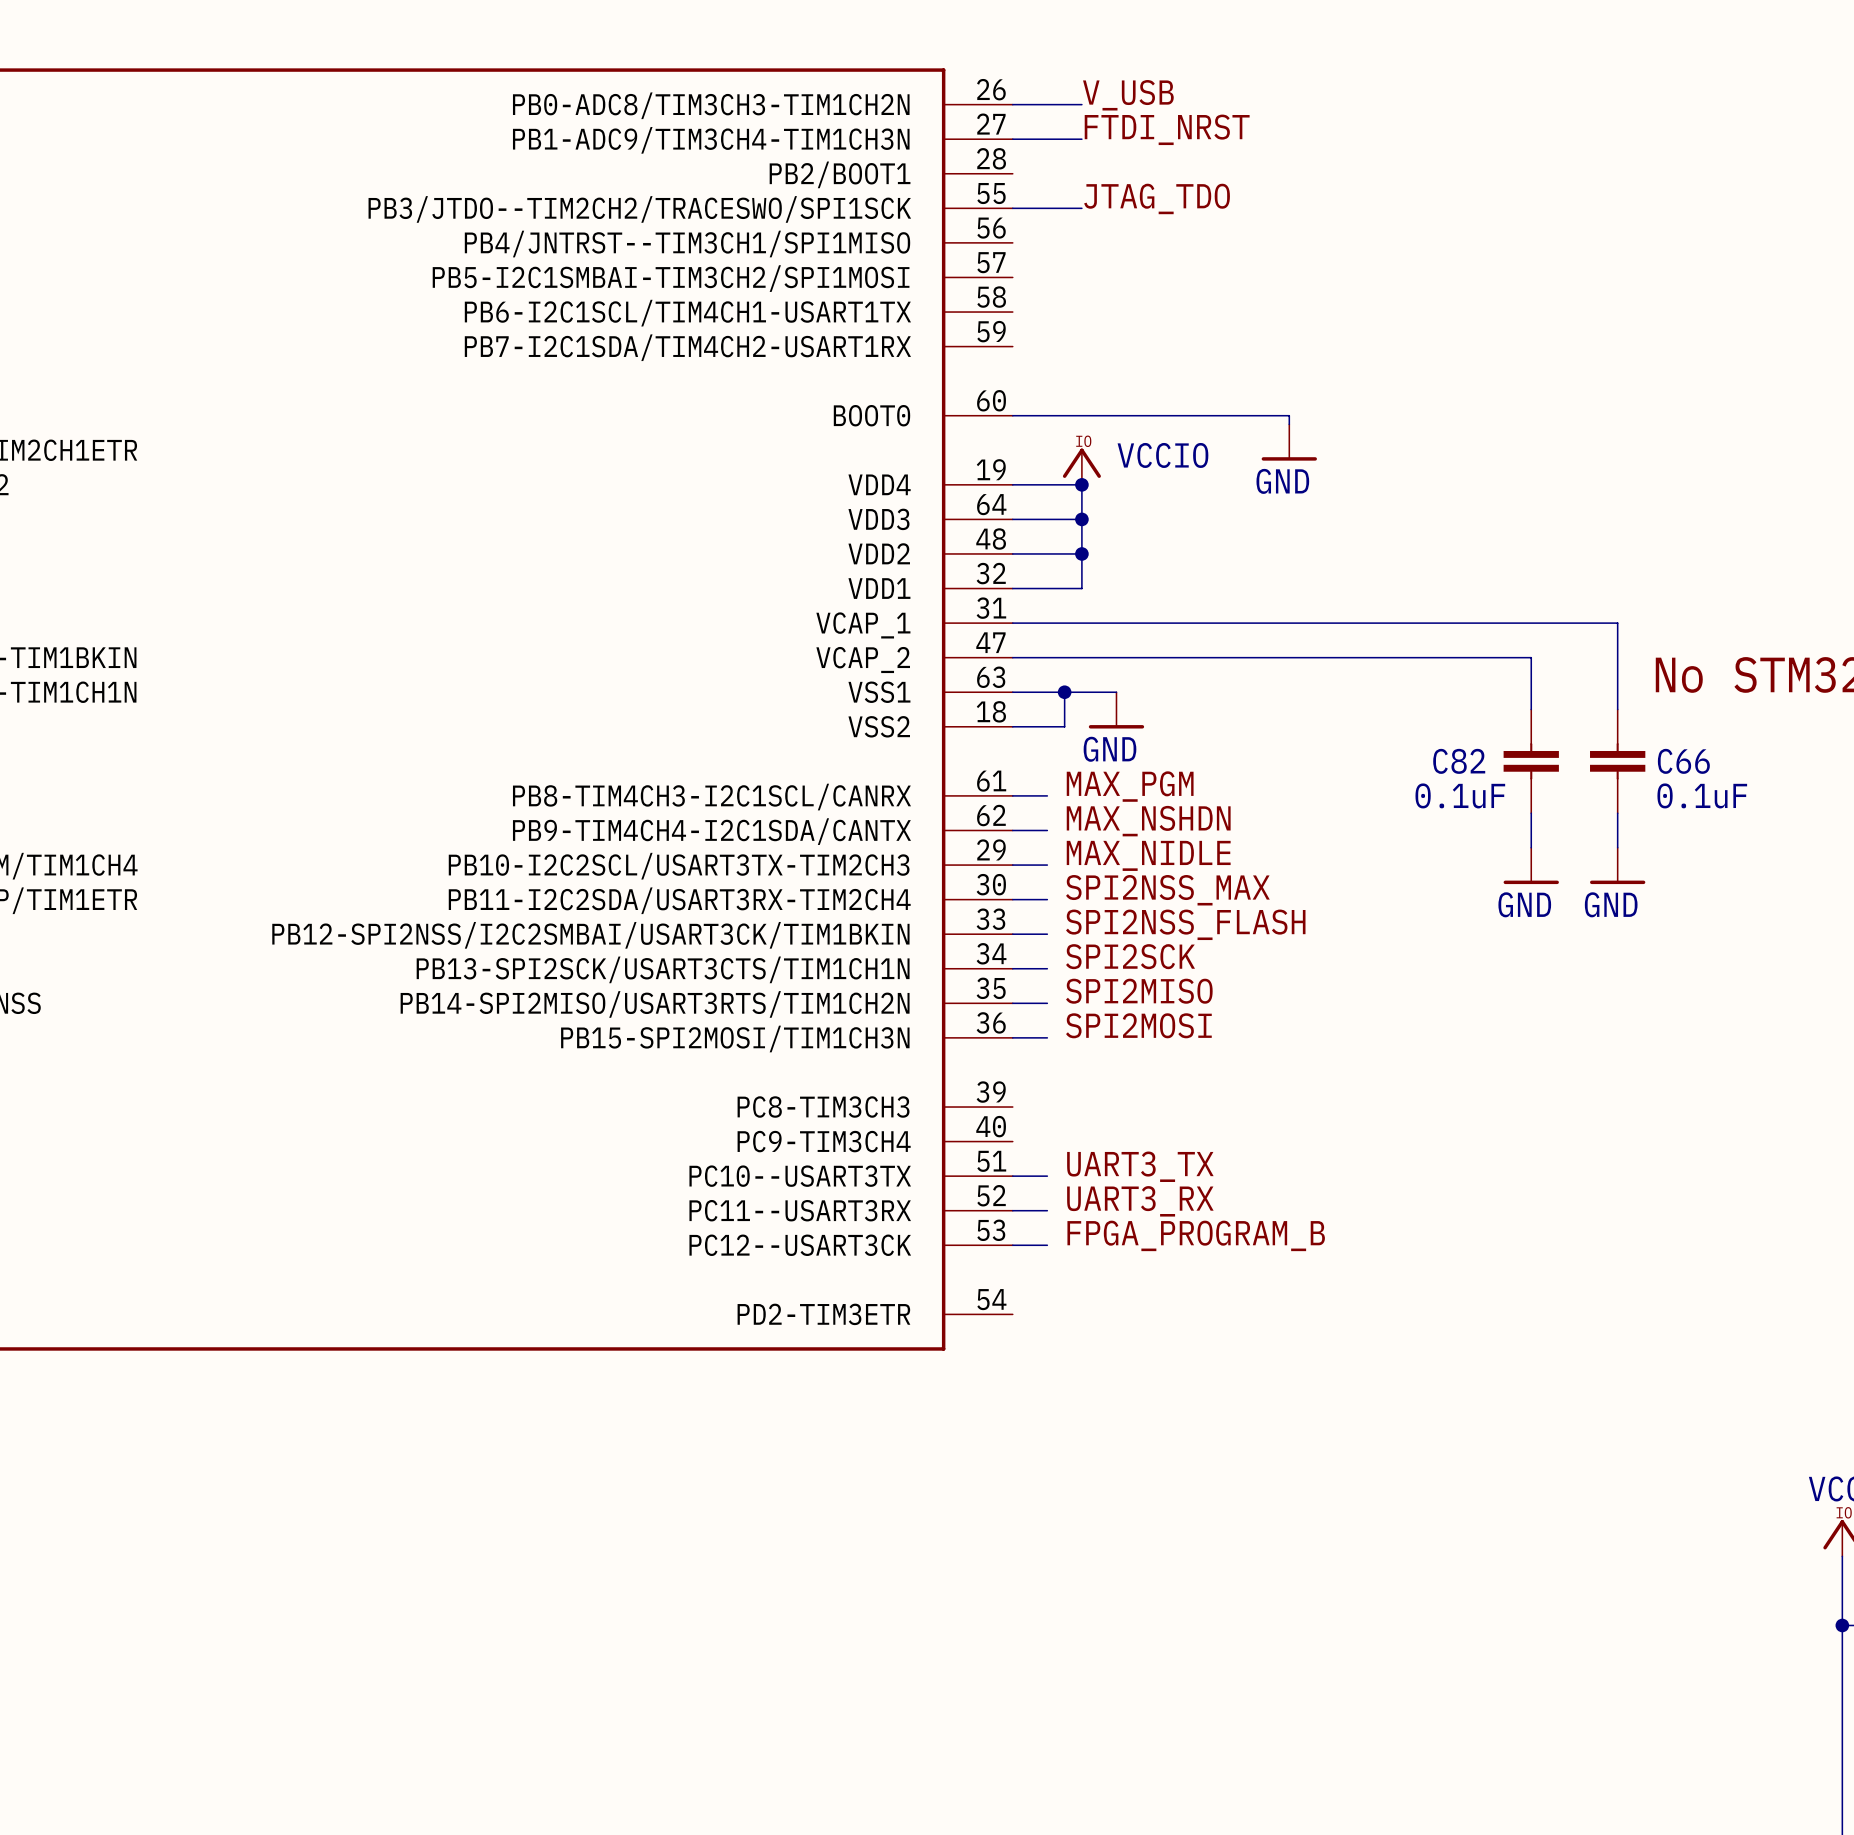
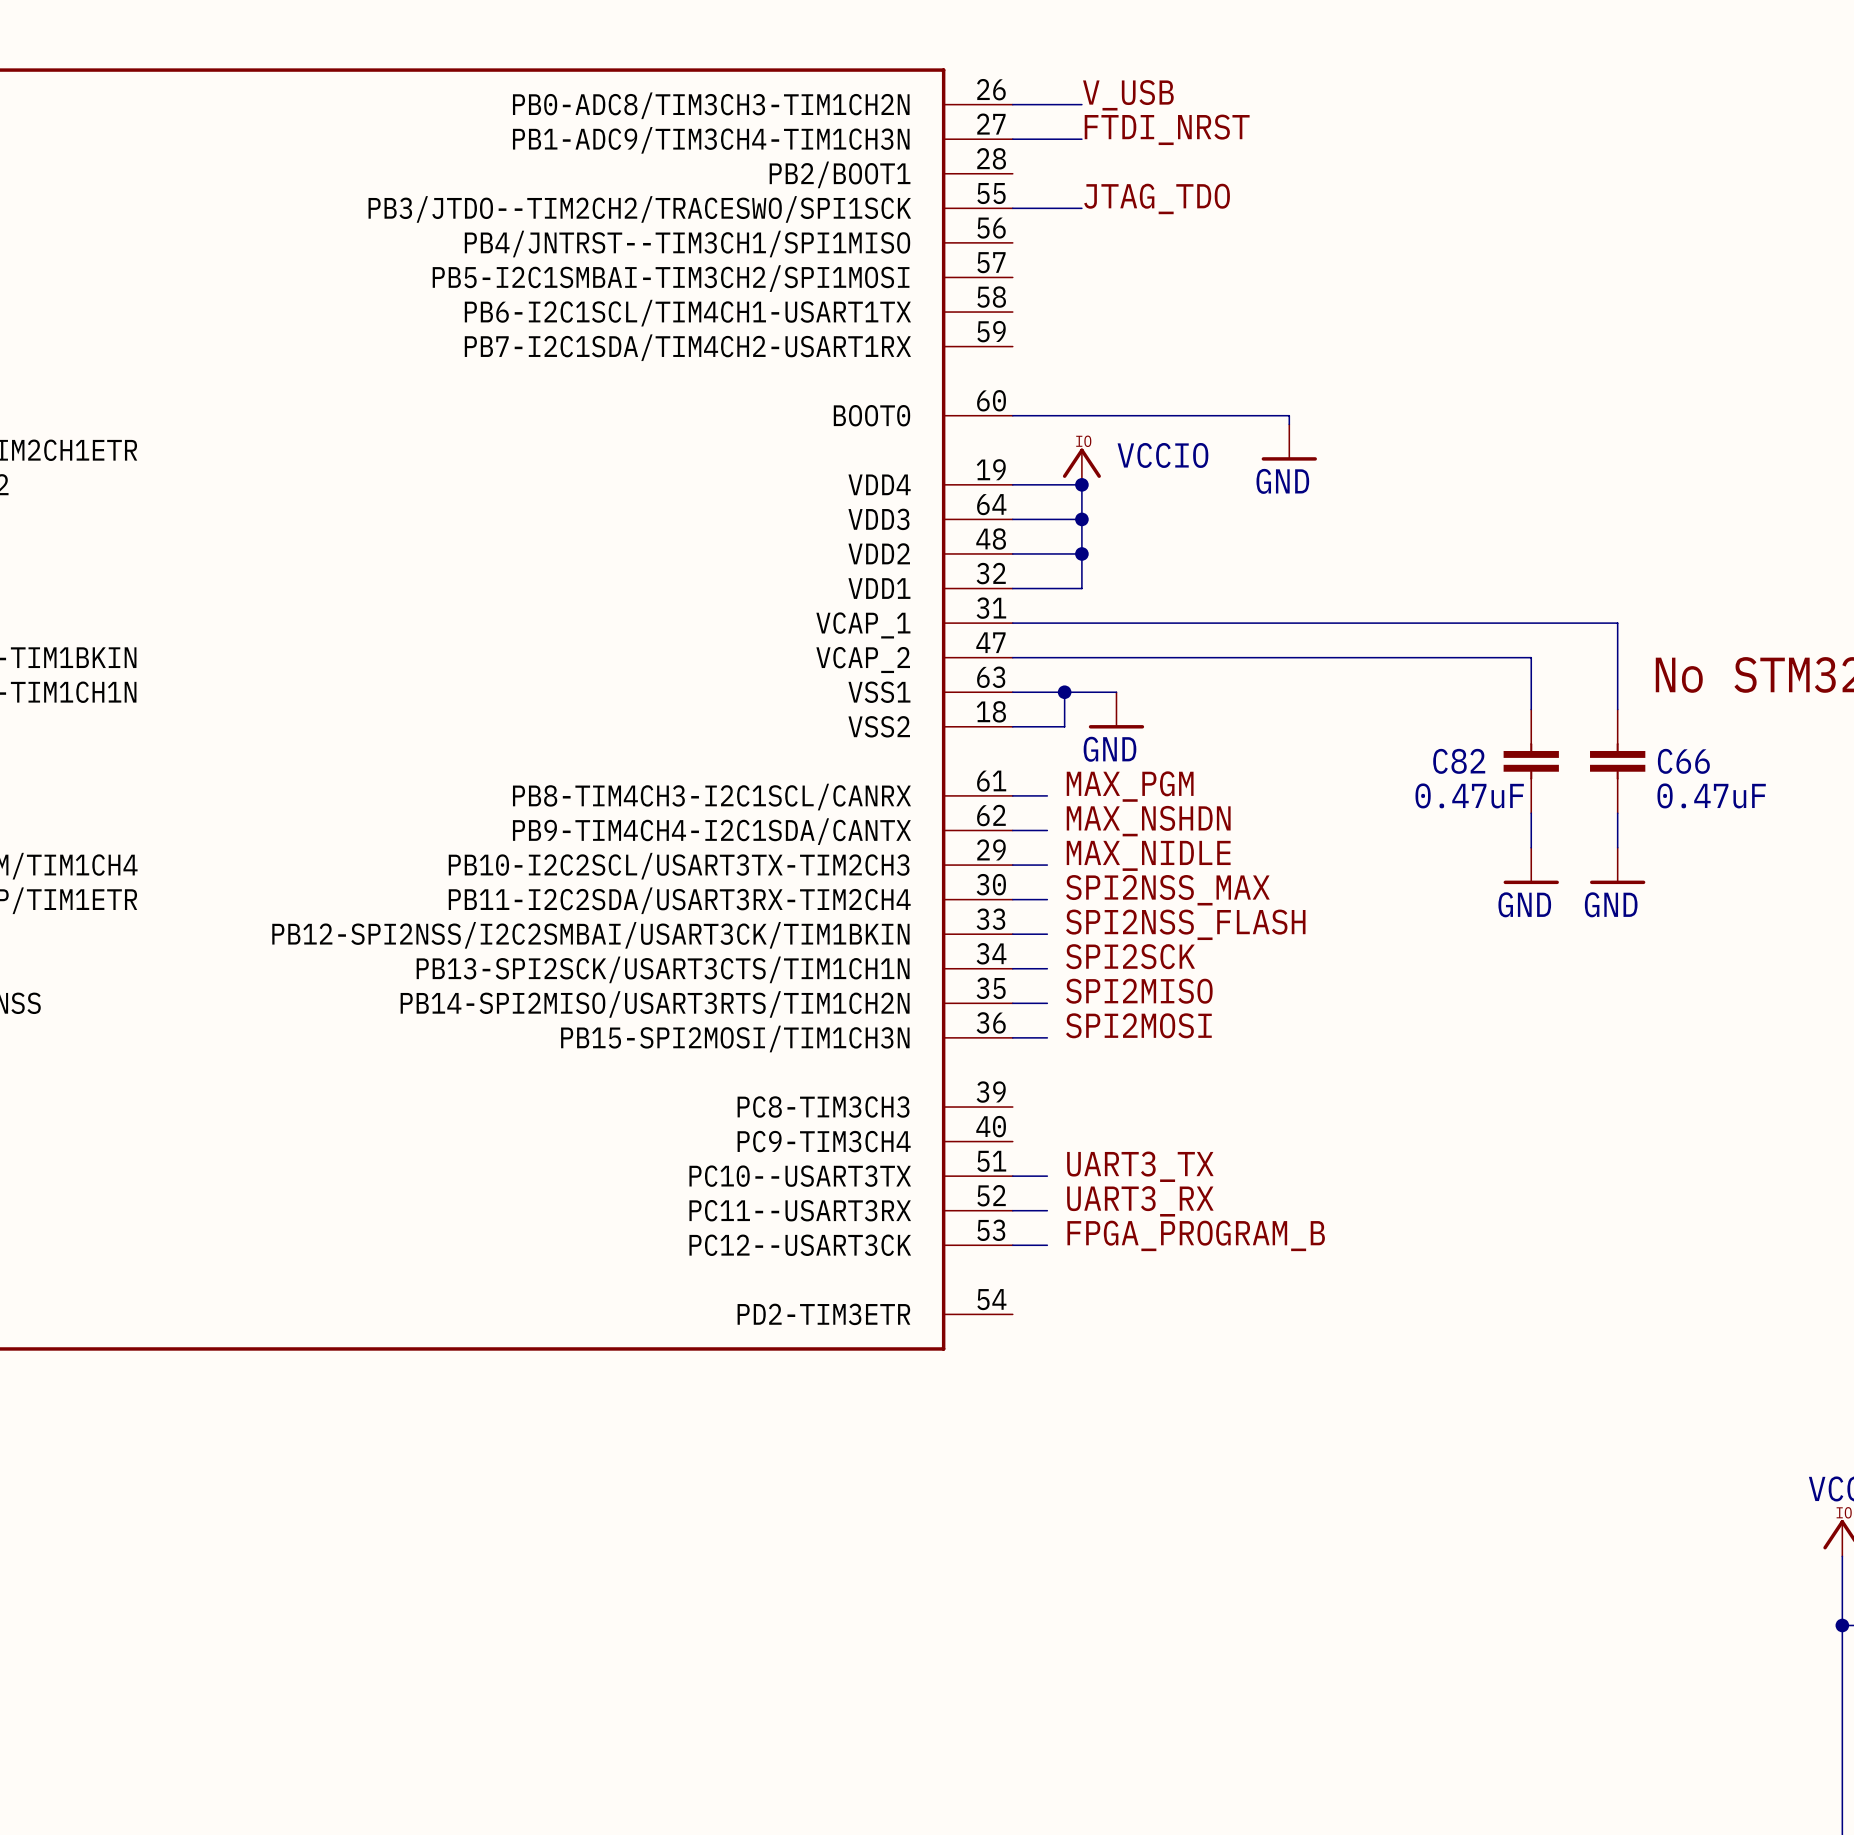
C82 value: 0.1uF (1460, 795) -> 0.47uF (1469, 795)
C66 value: 0.1uF (1702, 795) -> 0.47uF (1711, 795)

